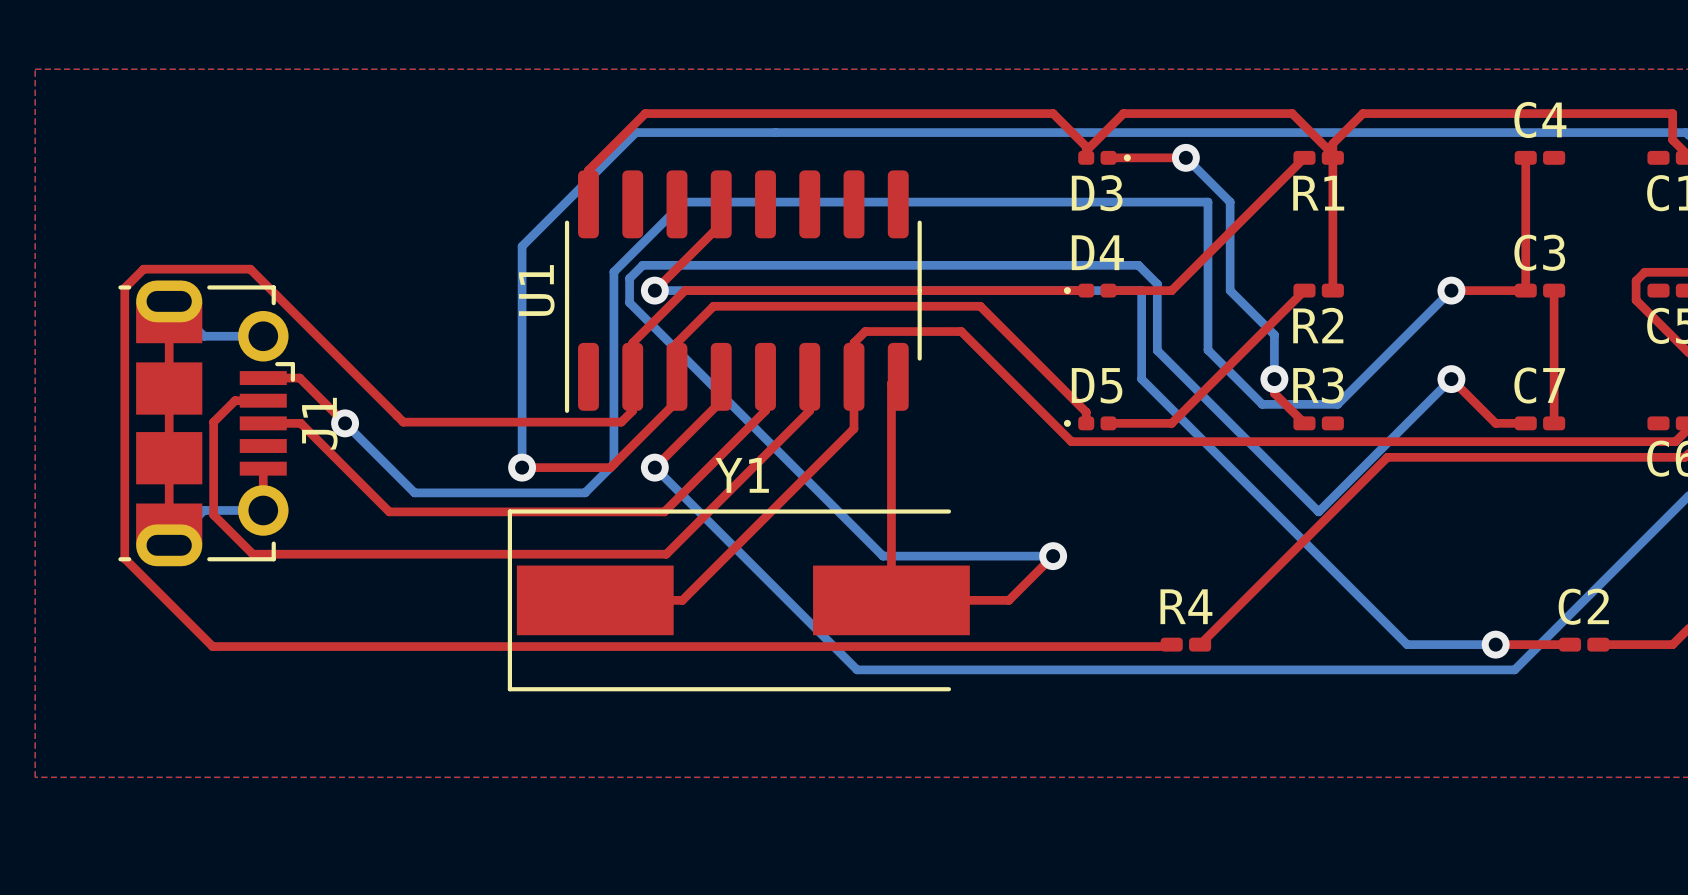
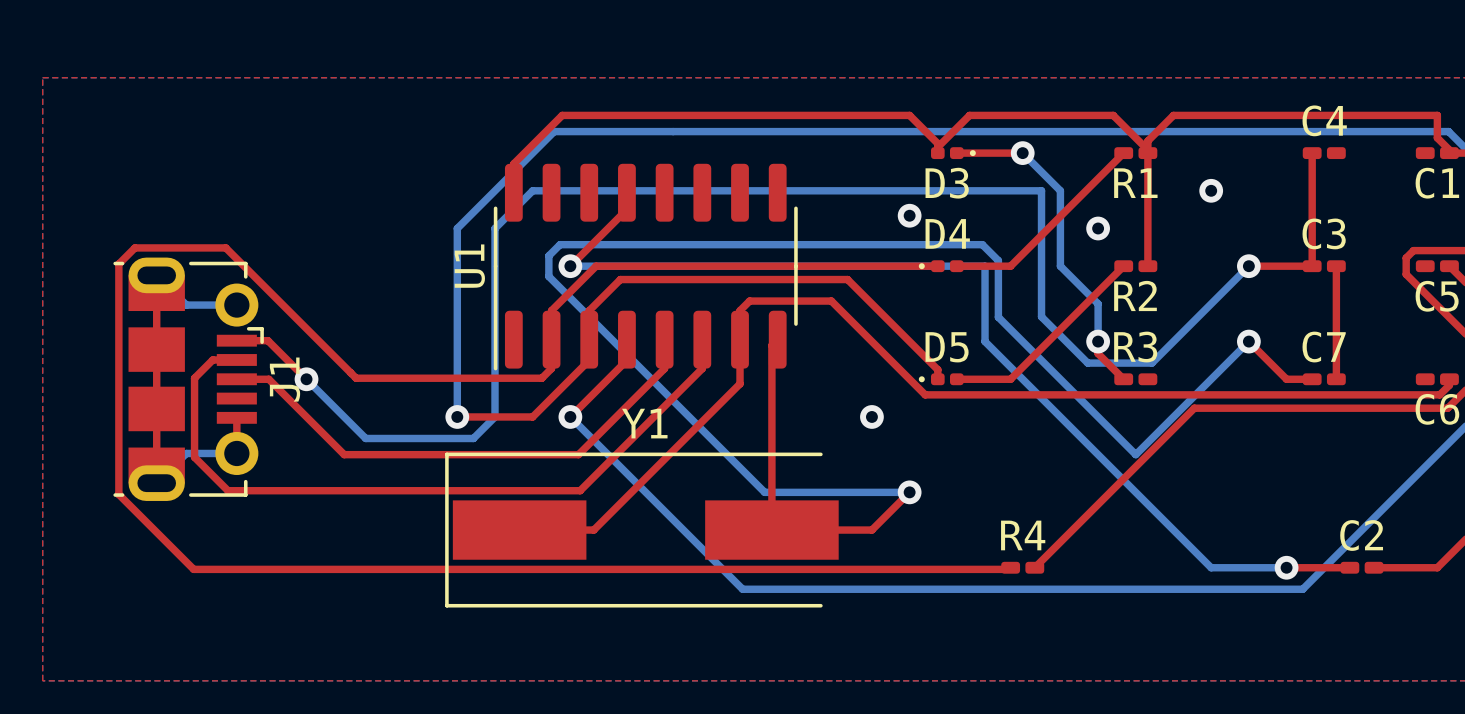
bottom track: (683, 202) (613, 271) (613, 464) (585, 492) (541, 492) -> (595, 190) (532, 190) (495, 228) (495, 416) (473, 438)
via: none -> (1211, 190)
via: none -> (909, 215)
via: none -> (1098, 228)
via: none -> (871, 416)

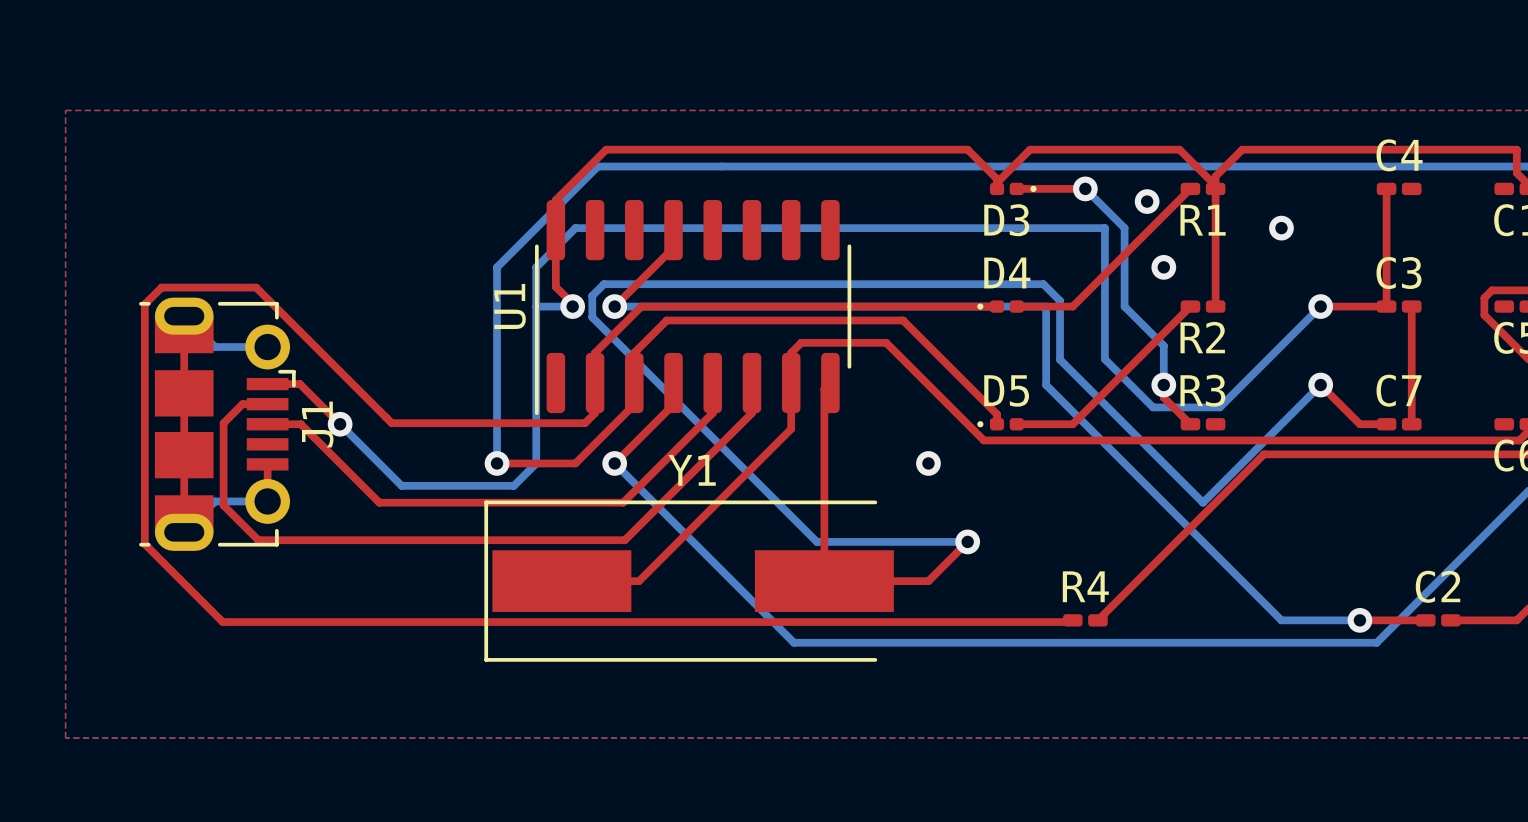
via: none -> (1147, 201)
top track: none -> (555, 230) (555, 286) (575, 306)
via: (909, 215) -> none
bottom track: none -> (536, 306) (575, 306)
via: none -> (572, 306)

